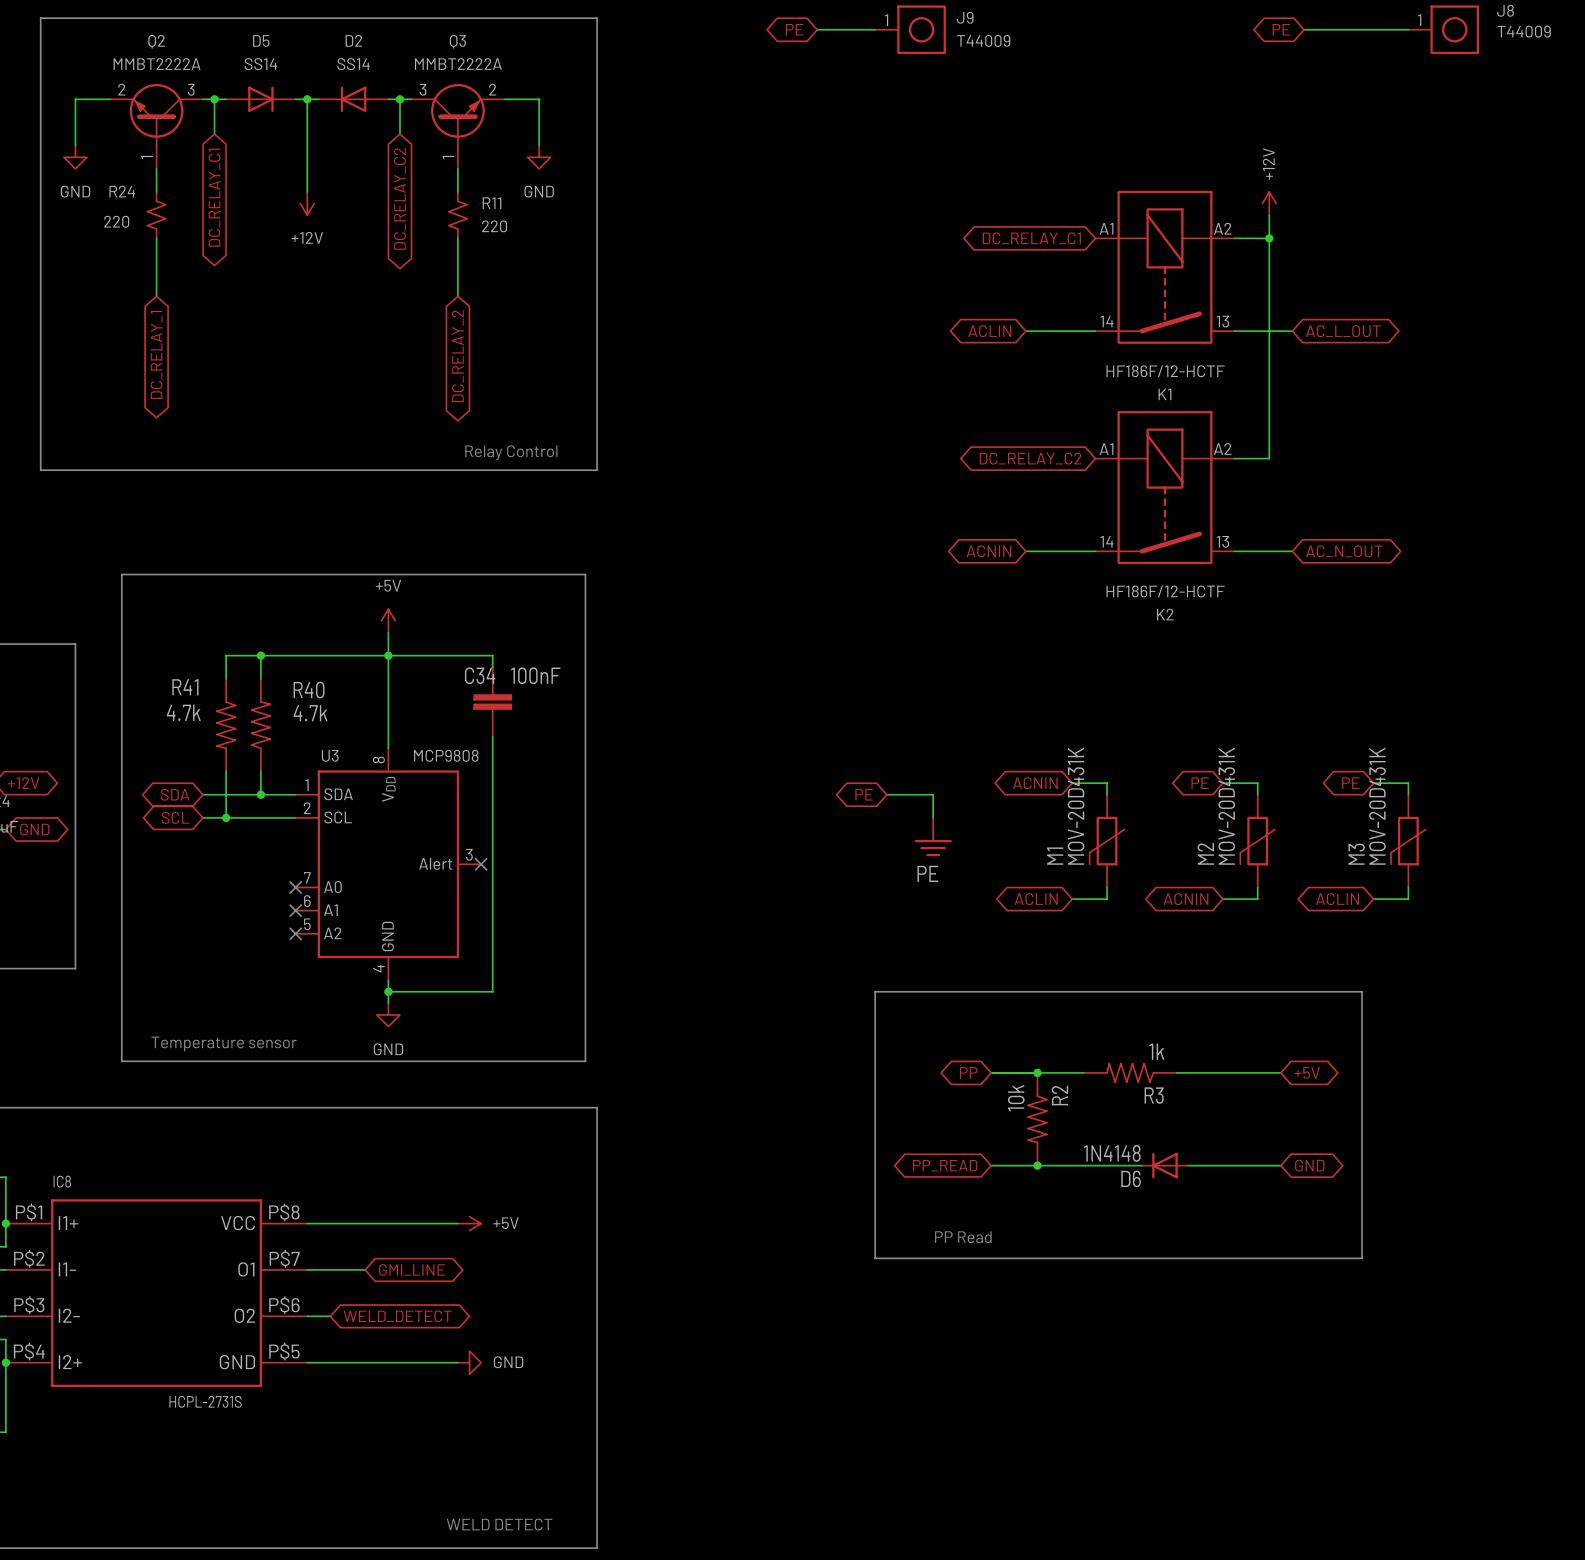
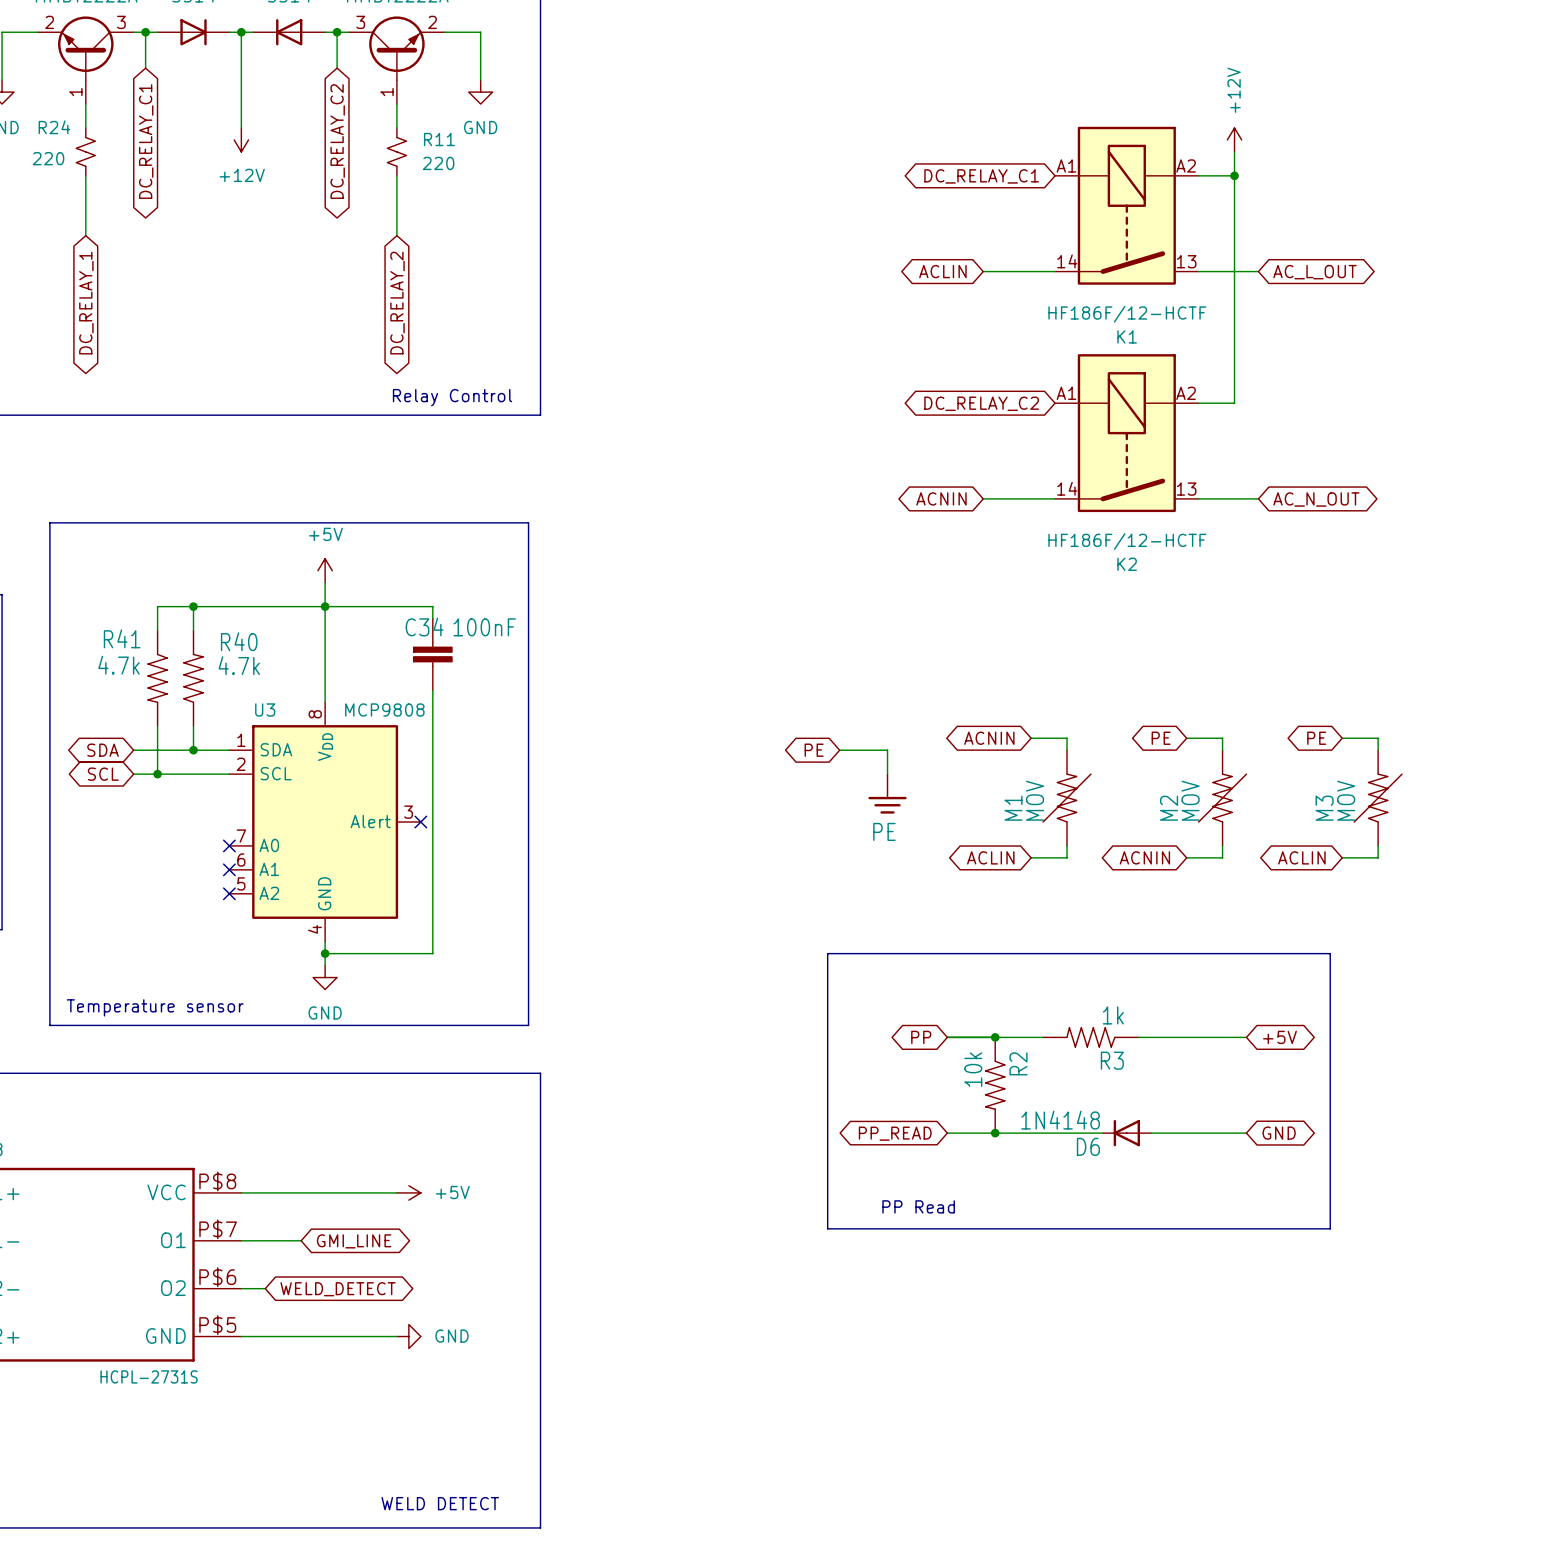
M1 symbol: [1089, 794, 1125, 888] -> [1042, 750, 1092, 846]
M2 symbol: [1240, 794, 1276, 888] -> [1197, 750, 1248, 846]
M3 symbol: [1391, 794, 1426, 888] -> [1353, 750, 1403, 846]
M1 value: MOV-20D431K (1076, 806) -> MOV (1035, 800)
M2 value: MOV-20D431K (1226, 806) -> MOV (1190, 800)
M3 value: MOV-20D431K (1377, 806) -> MOV (1346, 800)

